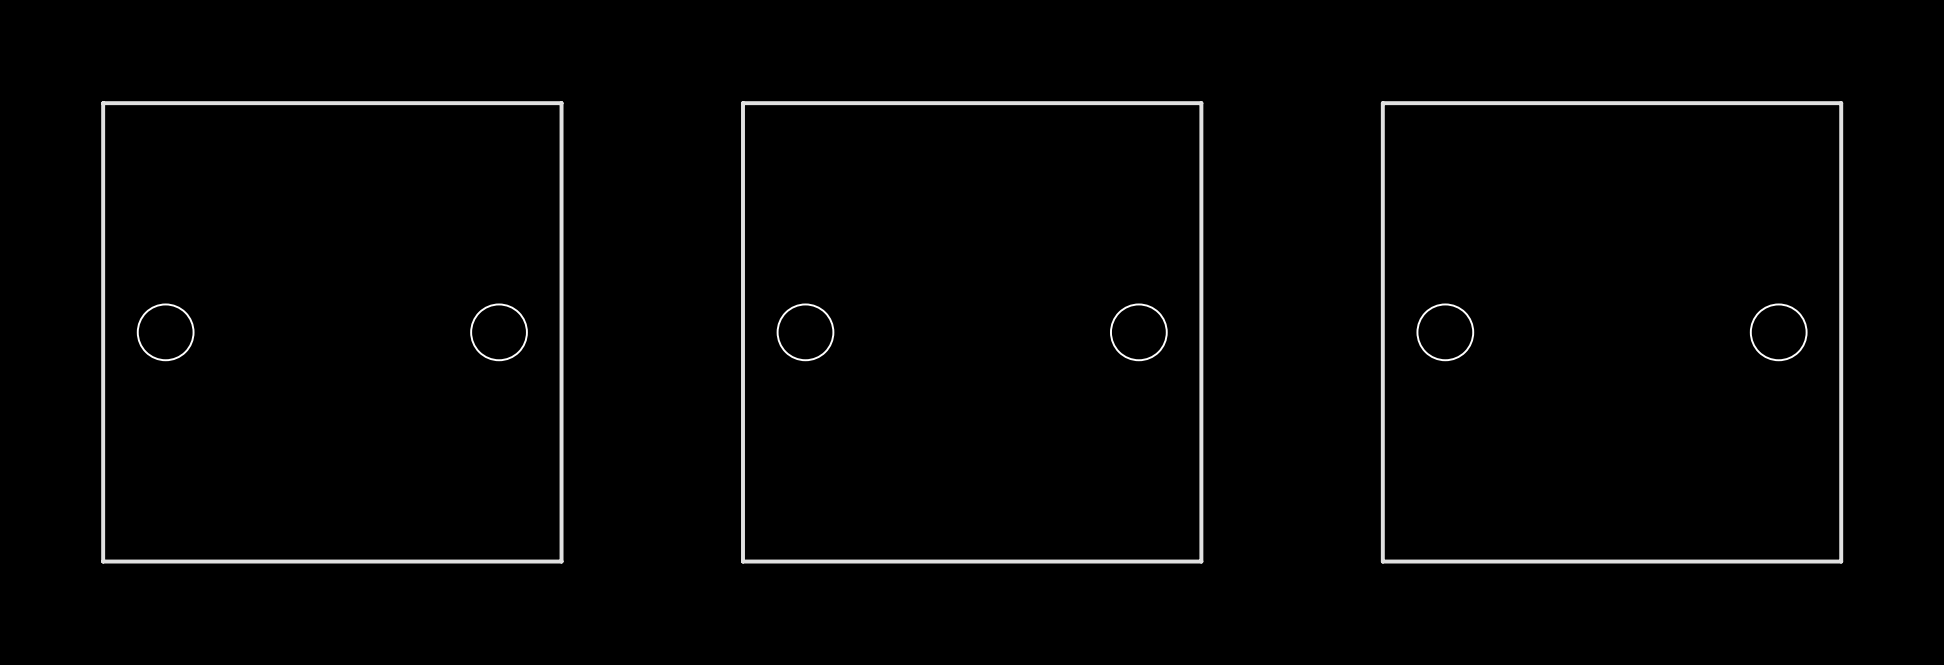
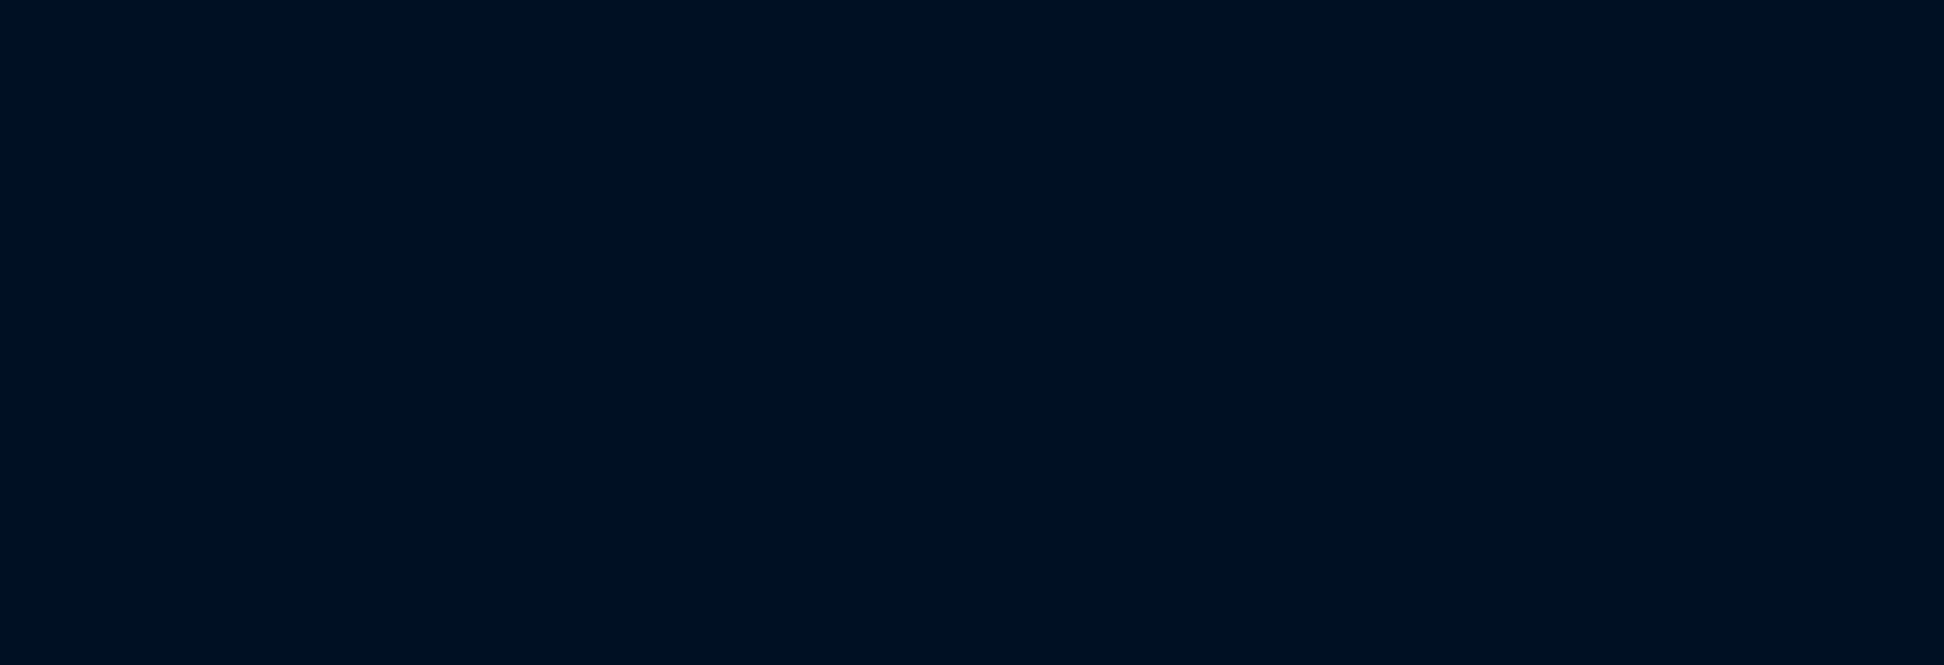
part: (332, 332) -> none
part: (972, 332) -> none
part: (1612, 332) -> none

